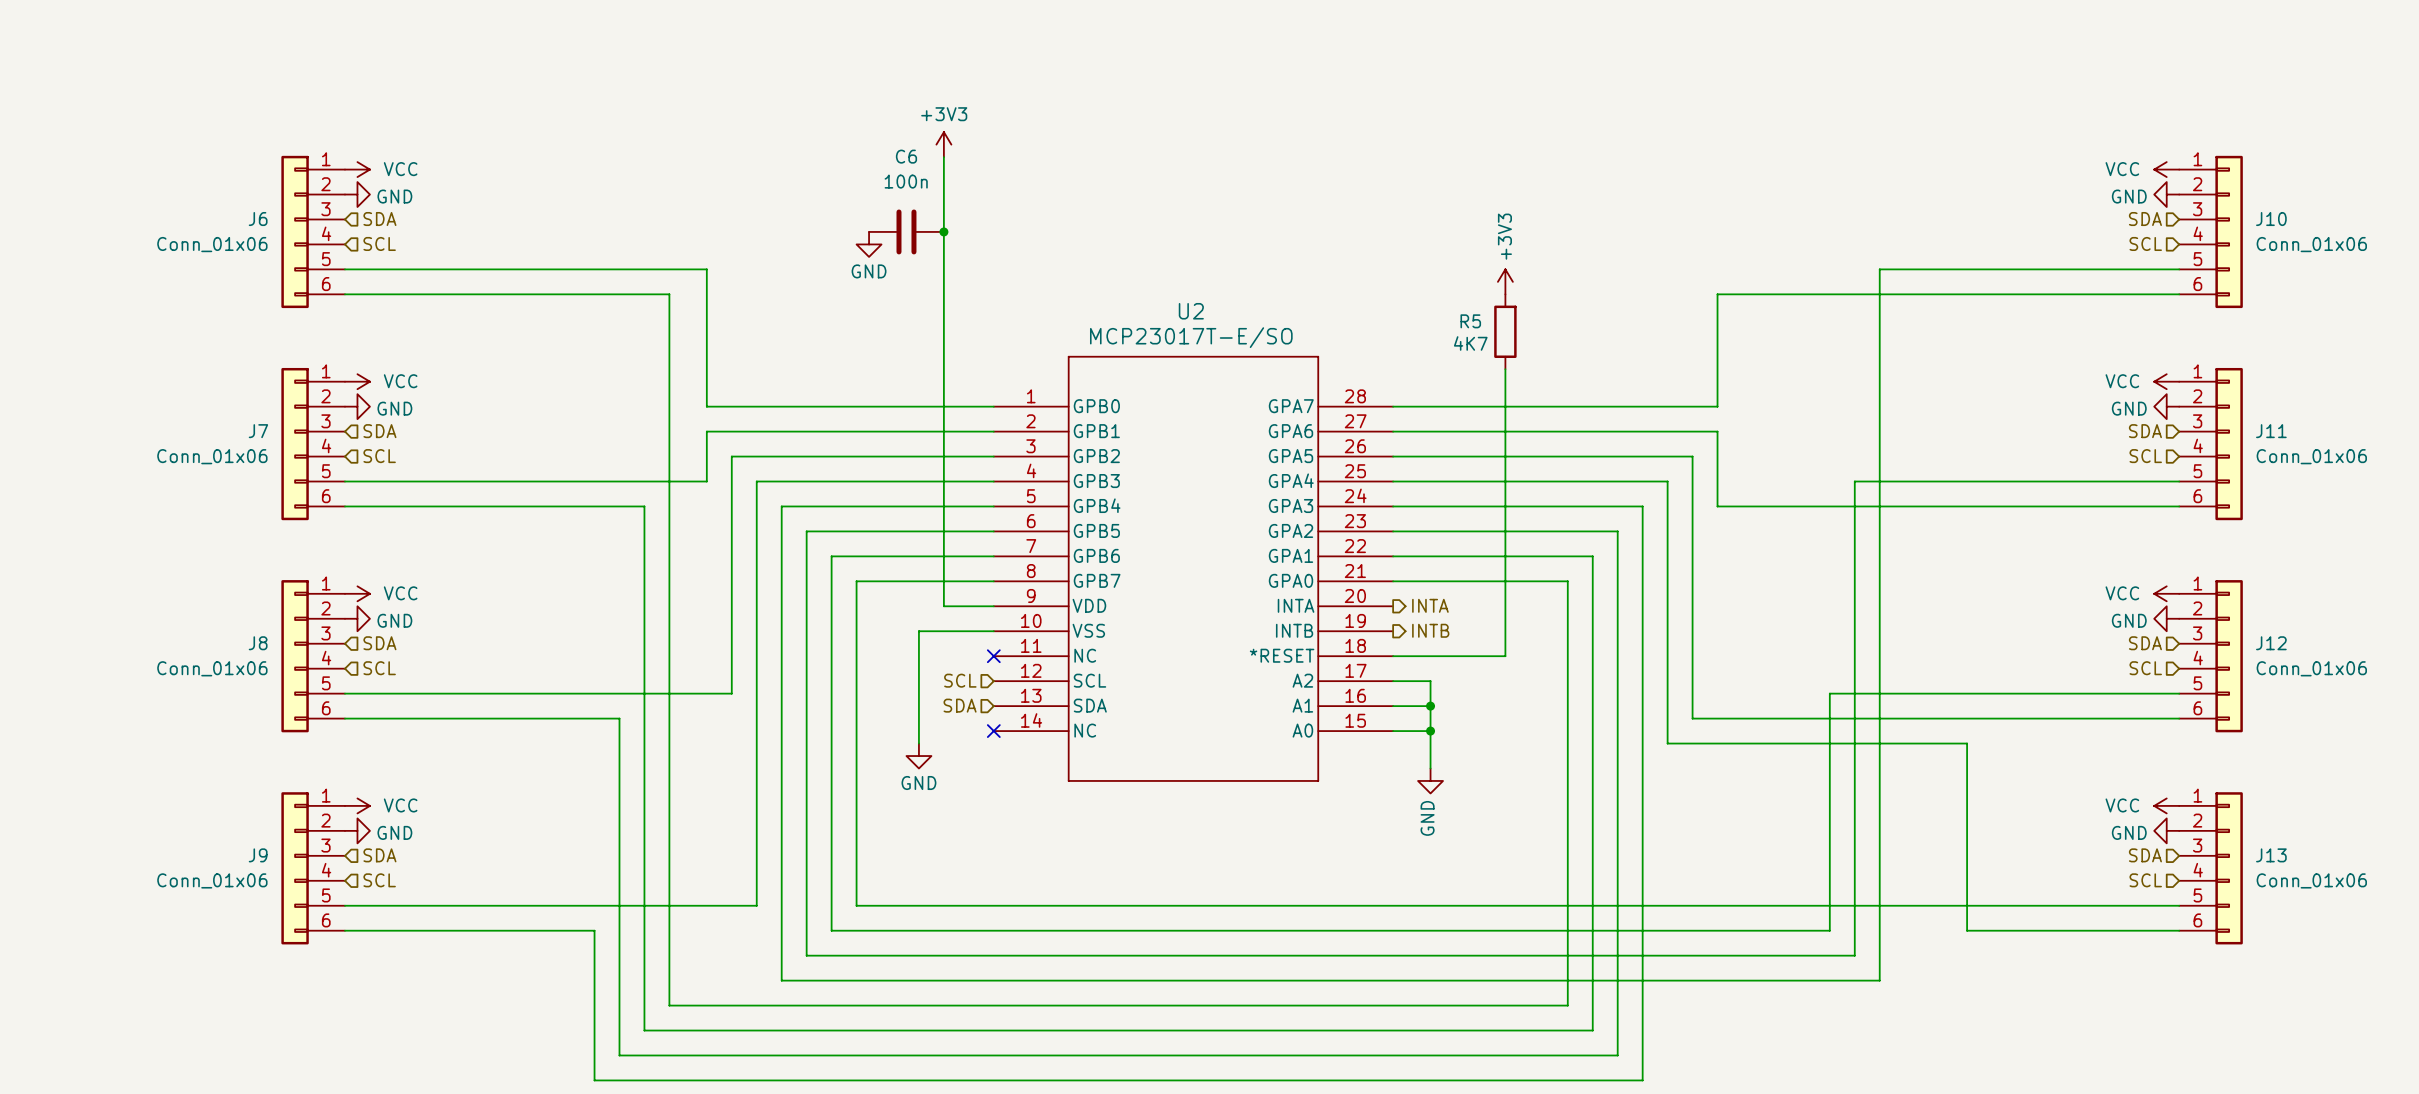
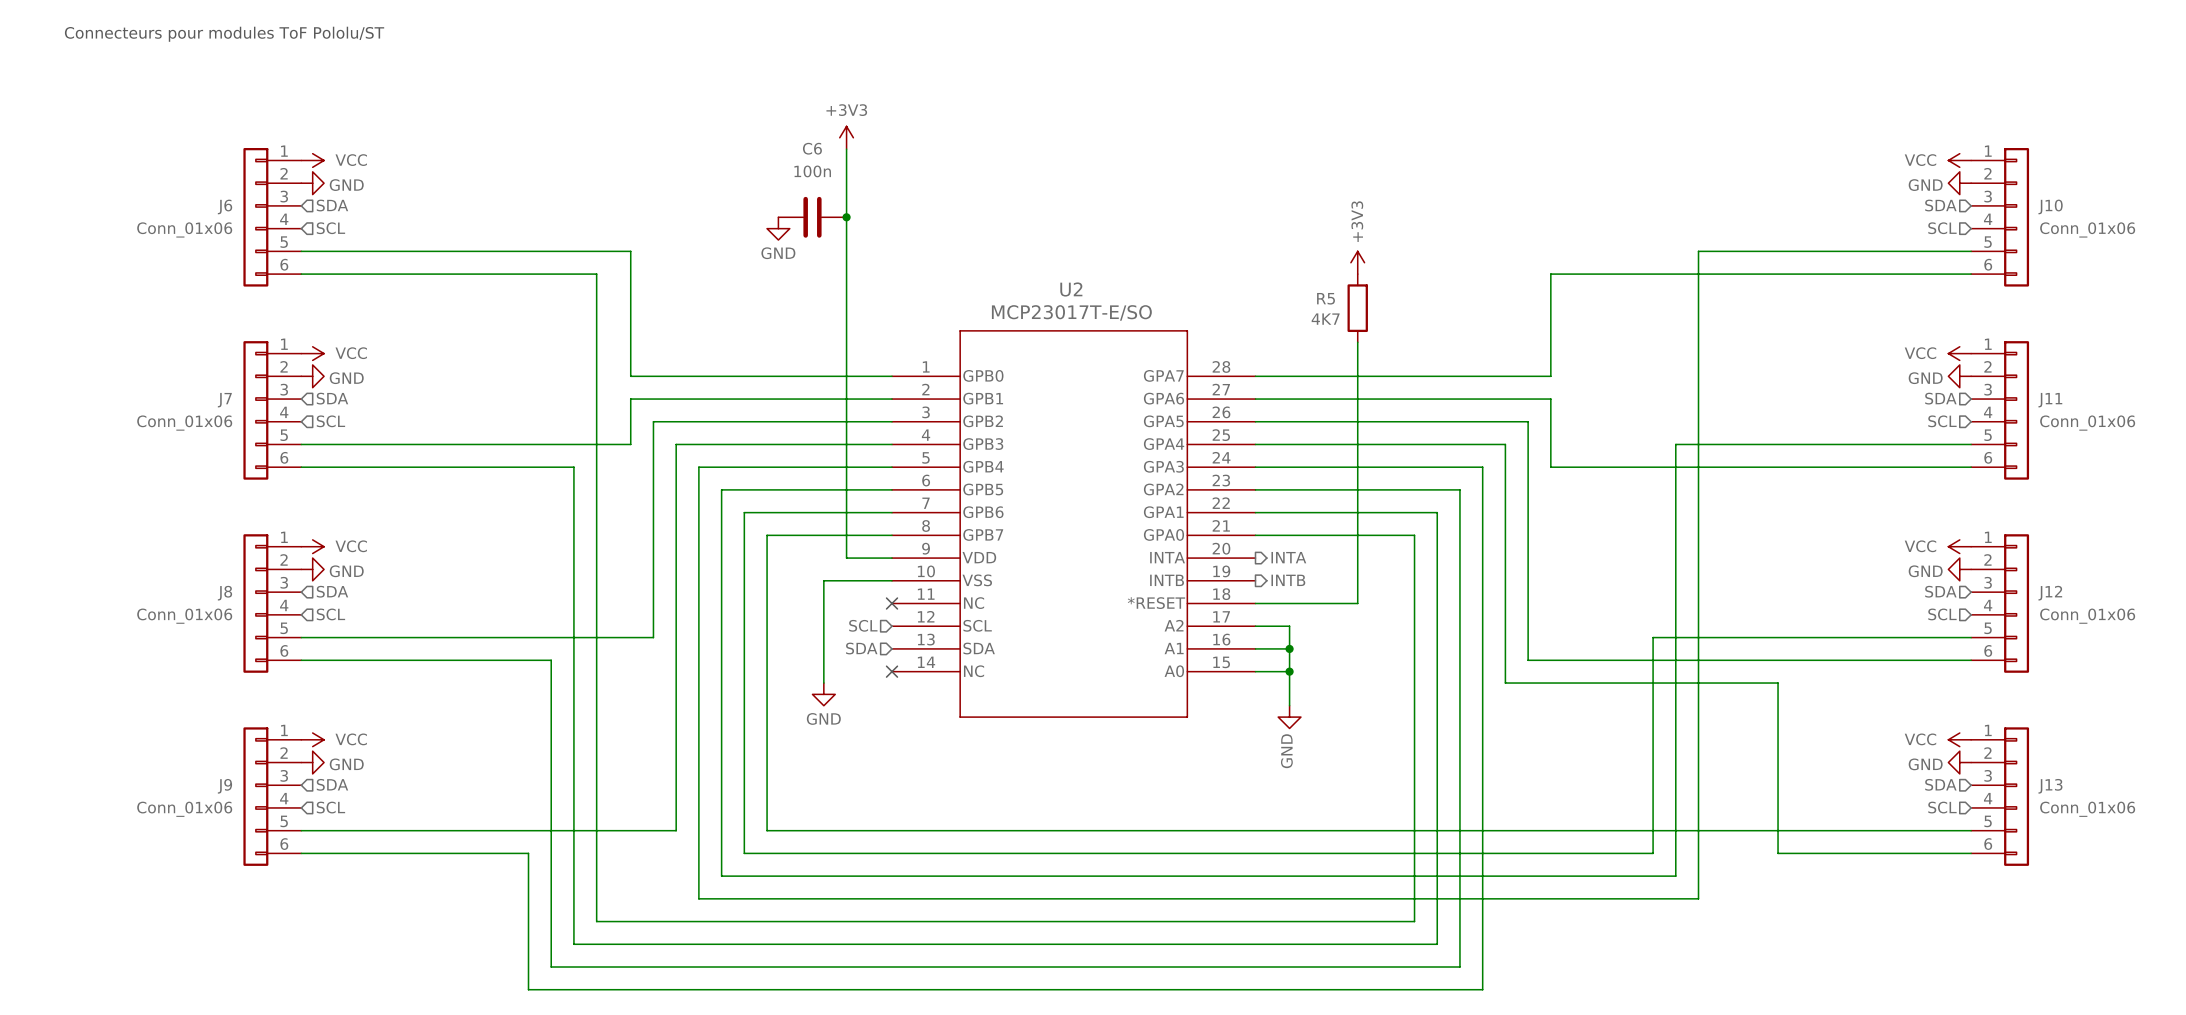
text: none -> Connecteurs pour modules ToF Pololu/ST (224, 34)

